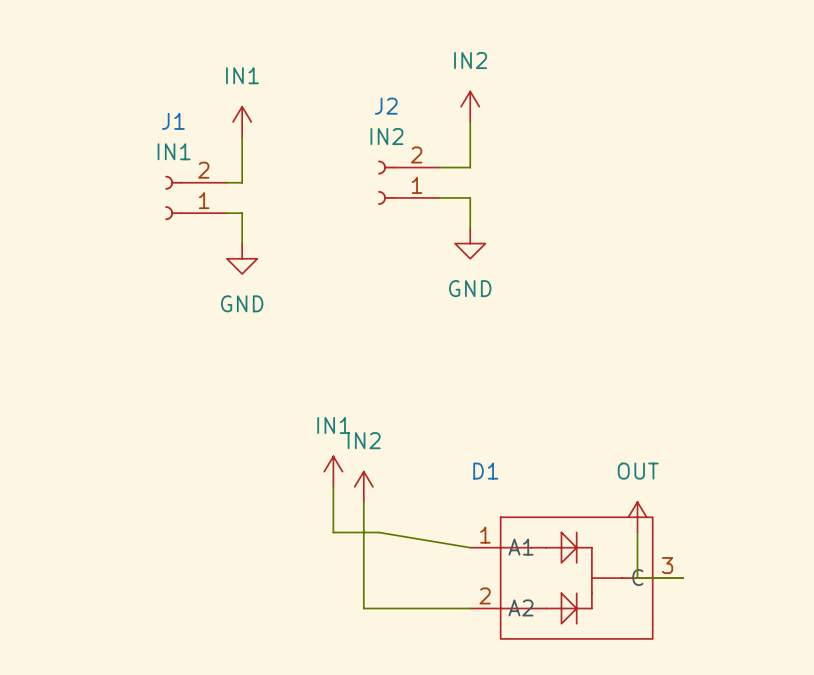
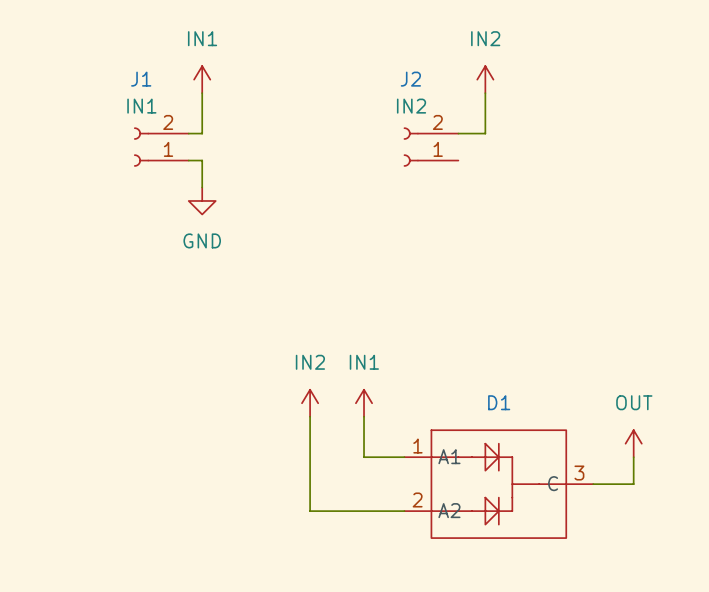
power symbol position: IN2 (470, 106) -> IN2 (485, 79)
wire: (470, 121) (470, 167) (439, 167) -> (485, 93) (485, 133) (458, 133)
J2 position: (408, 182) -> (431, 147)
wire: (439, 197) (470, 197) (470, 228) -> none
power symbol: GND (470, 243) -> none
power symbol position: IN1 (333, 471) -> IN1 (364, 403)
D1 name position: D1 (485, 471) -> D1 (499, 402)
wire: (333, 486) (333, 532) (379, 532) (470, 547) -> (364, 416) (364, 457) (404, 457)
power symbol position: OUT (637, 517) -> OUT (633, 443)
wire: (637, 532) (637, 578) (683, 578) -> (633, 457) (633, 484) (593, 484)

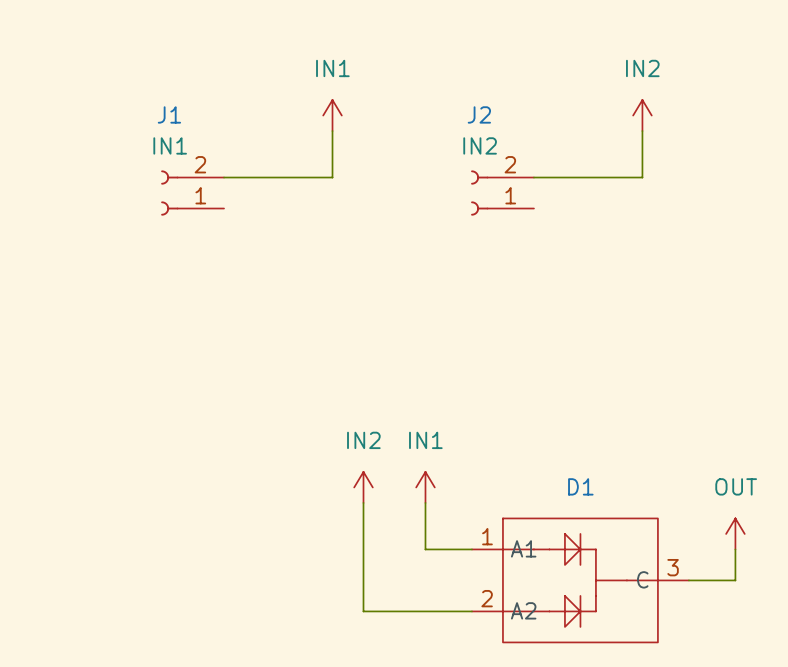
power symbol position: IN1 (202, 79) -> IN1 (332, 115)
power symbol position: IN2 (485, 79) -> IN2 (642, 115)
wire: (202, 93) (202, 133) -> (332, 131) (332, 177) (239, 177)
wire: (485, 93) (485, 133) -> (642, 131) (642, 177) (564, 177)
wire: (188, 160) (202, 160) (202, 187) -> none
power symbol: GND (202, 200) -> none

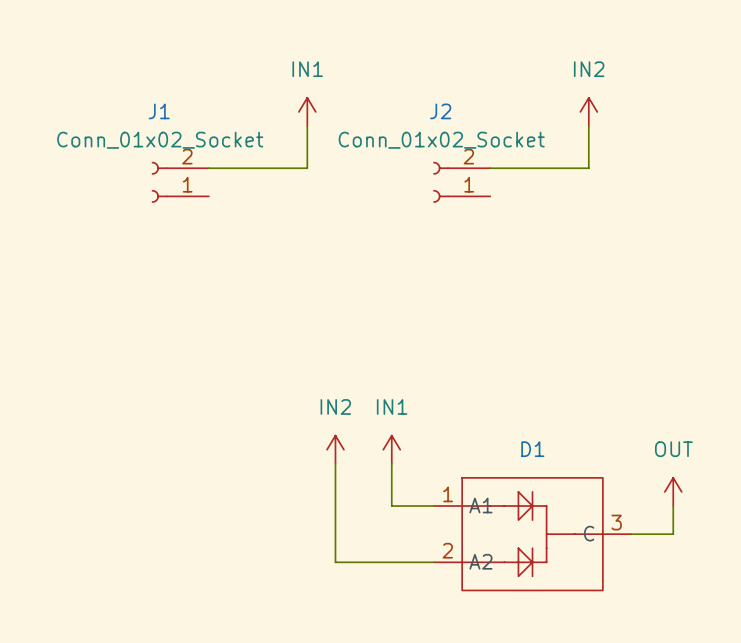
J1 value: IN1 (170, 145) -> Conn_01x02_Socket (160, 140)
J2 value: IN2 (480, 145) -> Conn_01x02_Socket (441, 140)

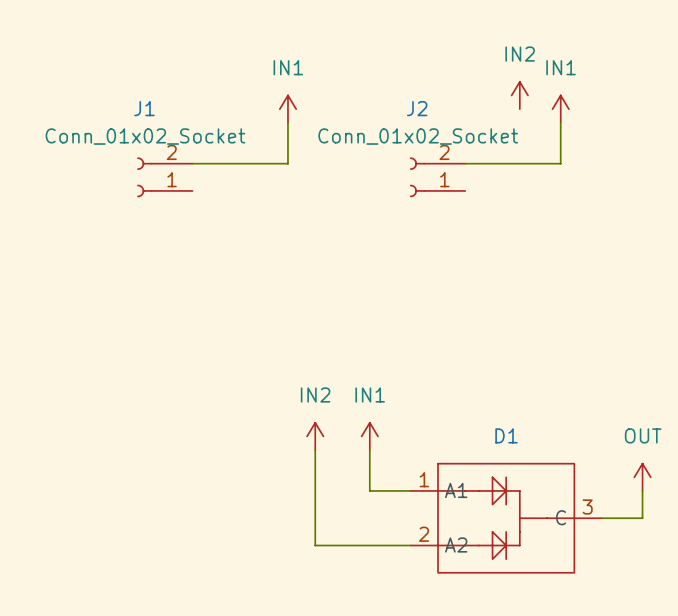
power symbol: none -> IN2 (519, 95)
power symbol: IN2 (588, 111) -> IN1 (560, 109)

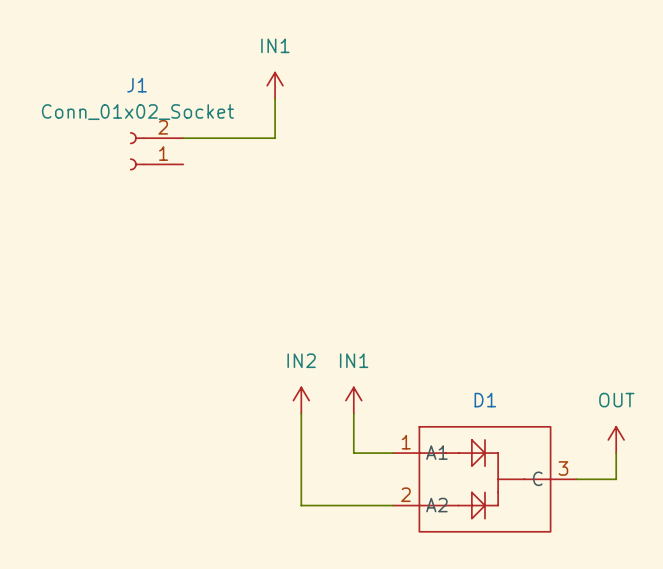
power symbol: IN2 (519, 95) -> none
power symbol: IN1 (560, 109) -> none
wire: (560, 122) (560, 163) (465, 163) -> none
J2: Conn_01x02_Socket (437, 177) -> none

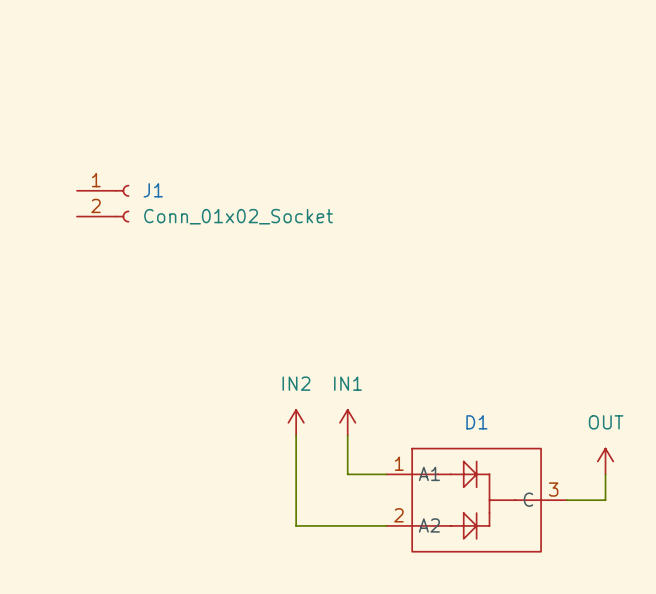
J1 name position: J1 (136, 85) -> J1 (153, 190)
power symbol: IN1 (275, 85) -> none
wire: (275, 98) (275, 138) (183, 138) -> none
J1 value position: Conn_01x02_Socket (137, 112) -> Conn_01x02_Socket (238, 216)
J1 rotation: 0° (137, 151) -> 180° (122, 203)
J1 position: (156, 151) -> (103, 203)

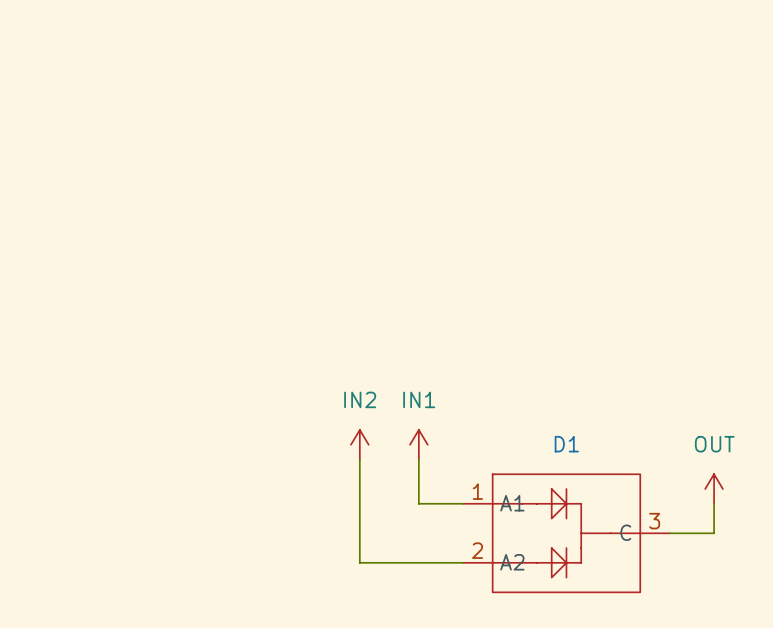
J1: Conn_01x02_Socket (103, 203) -> none

